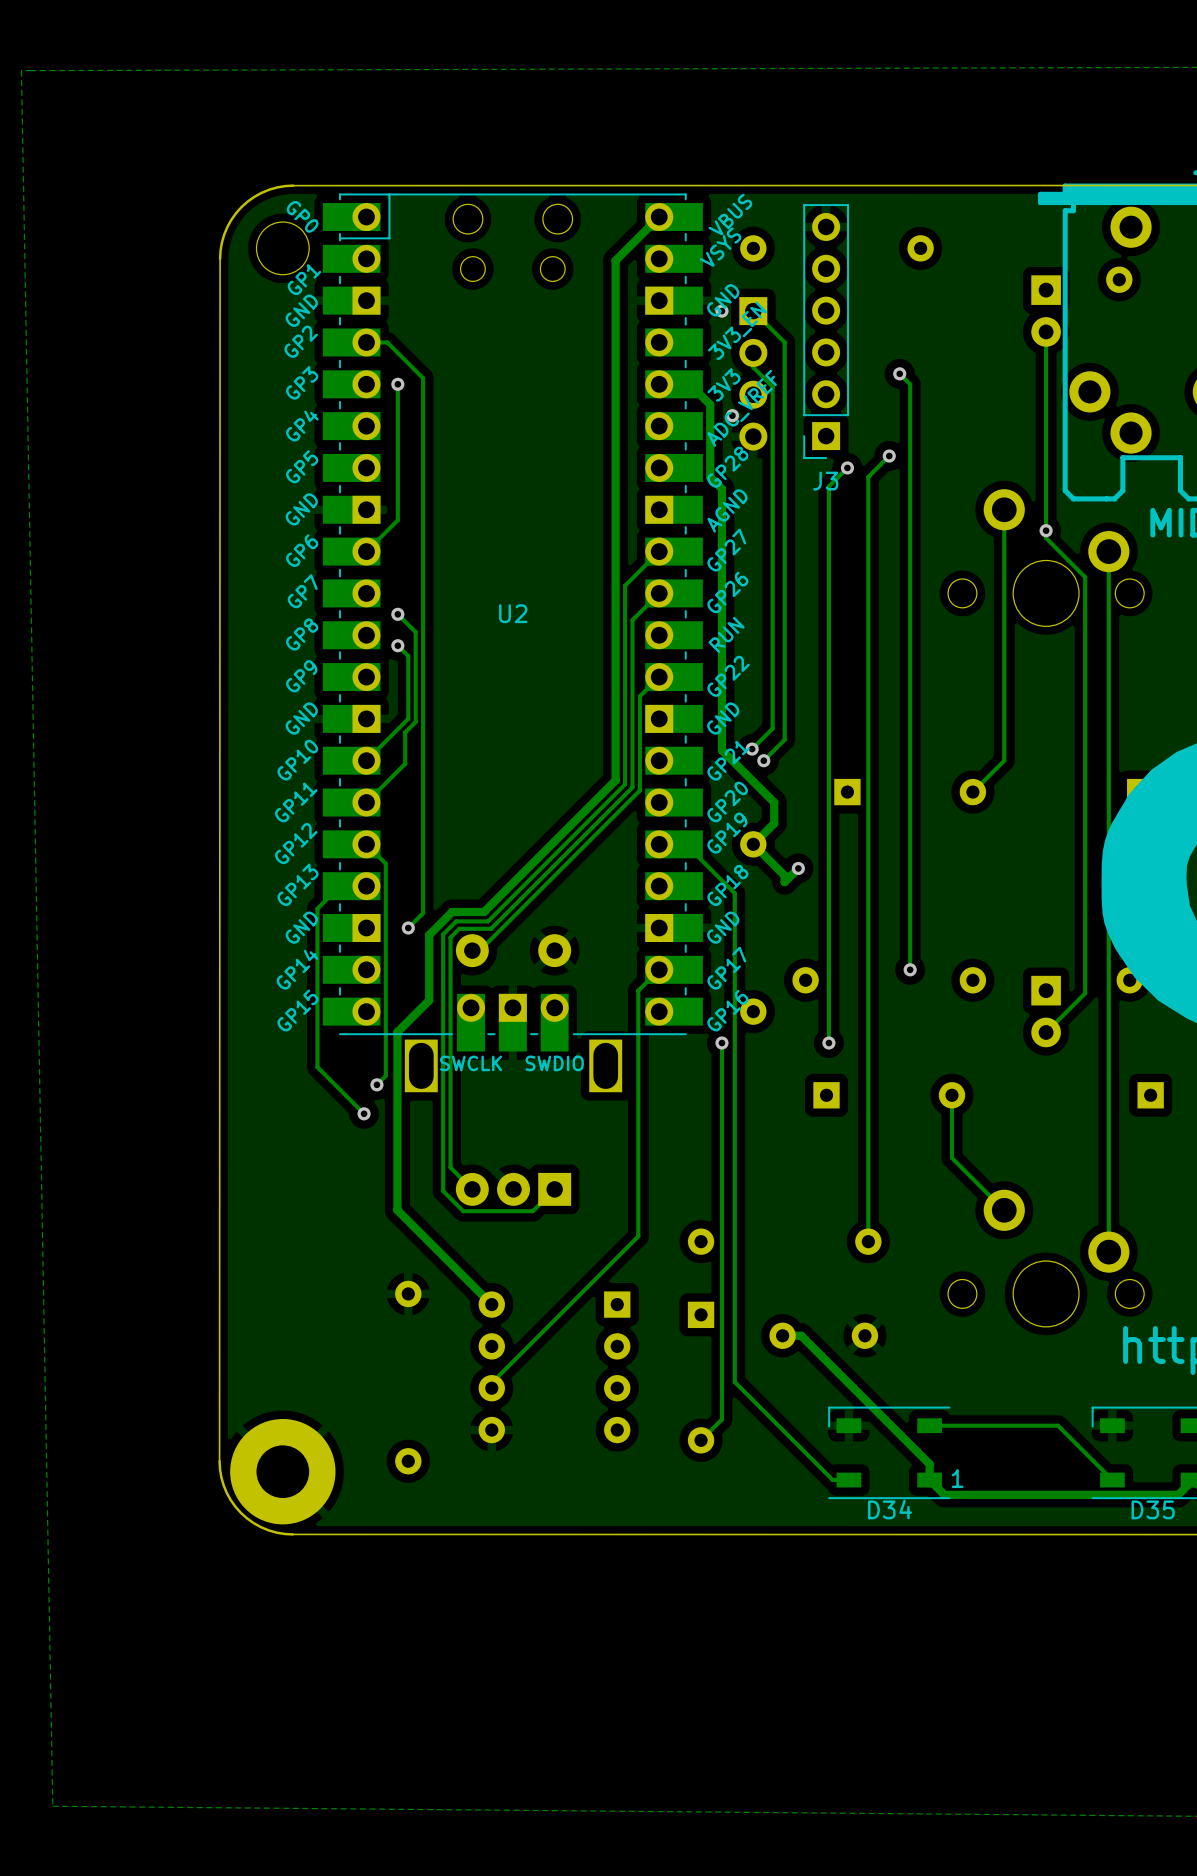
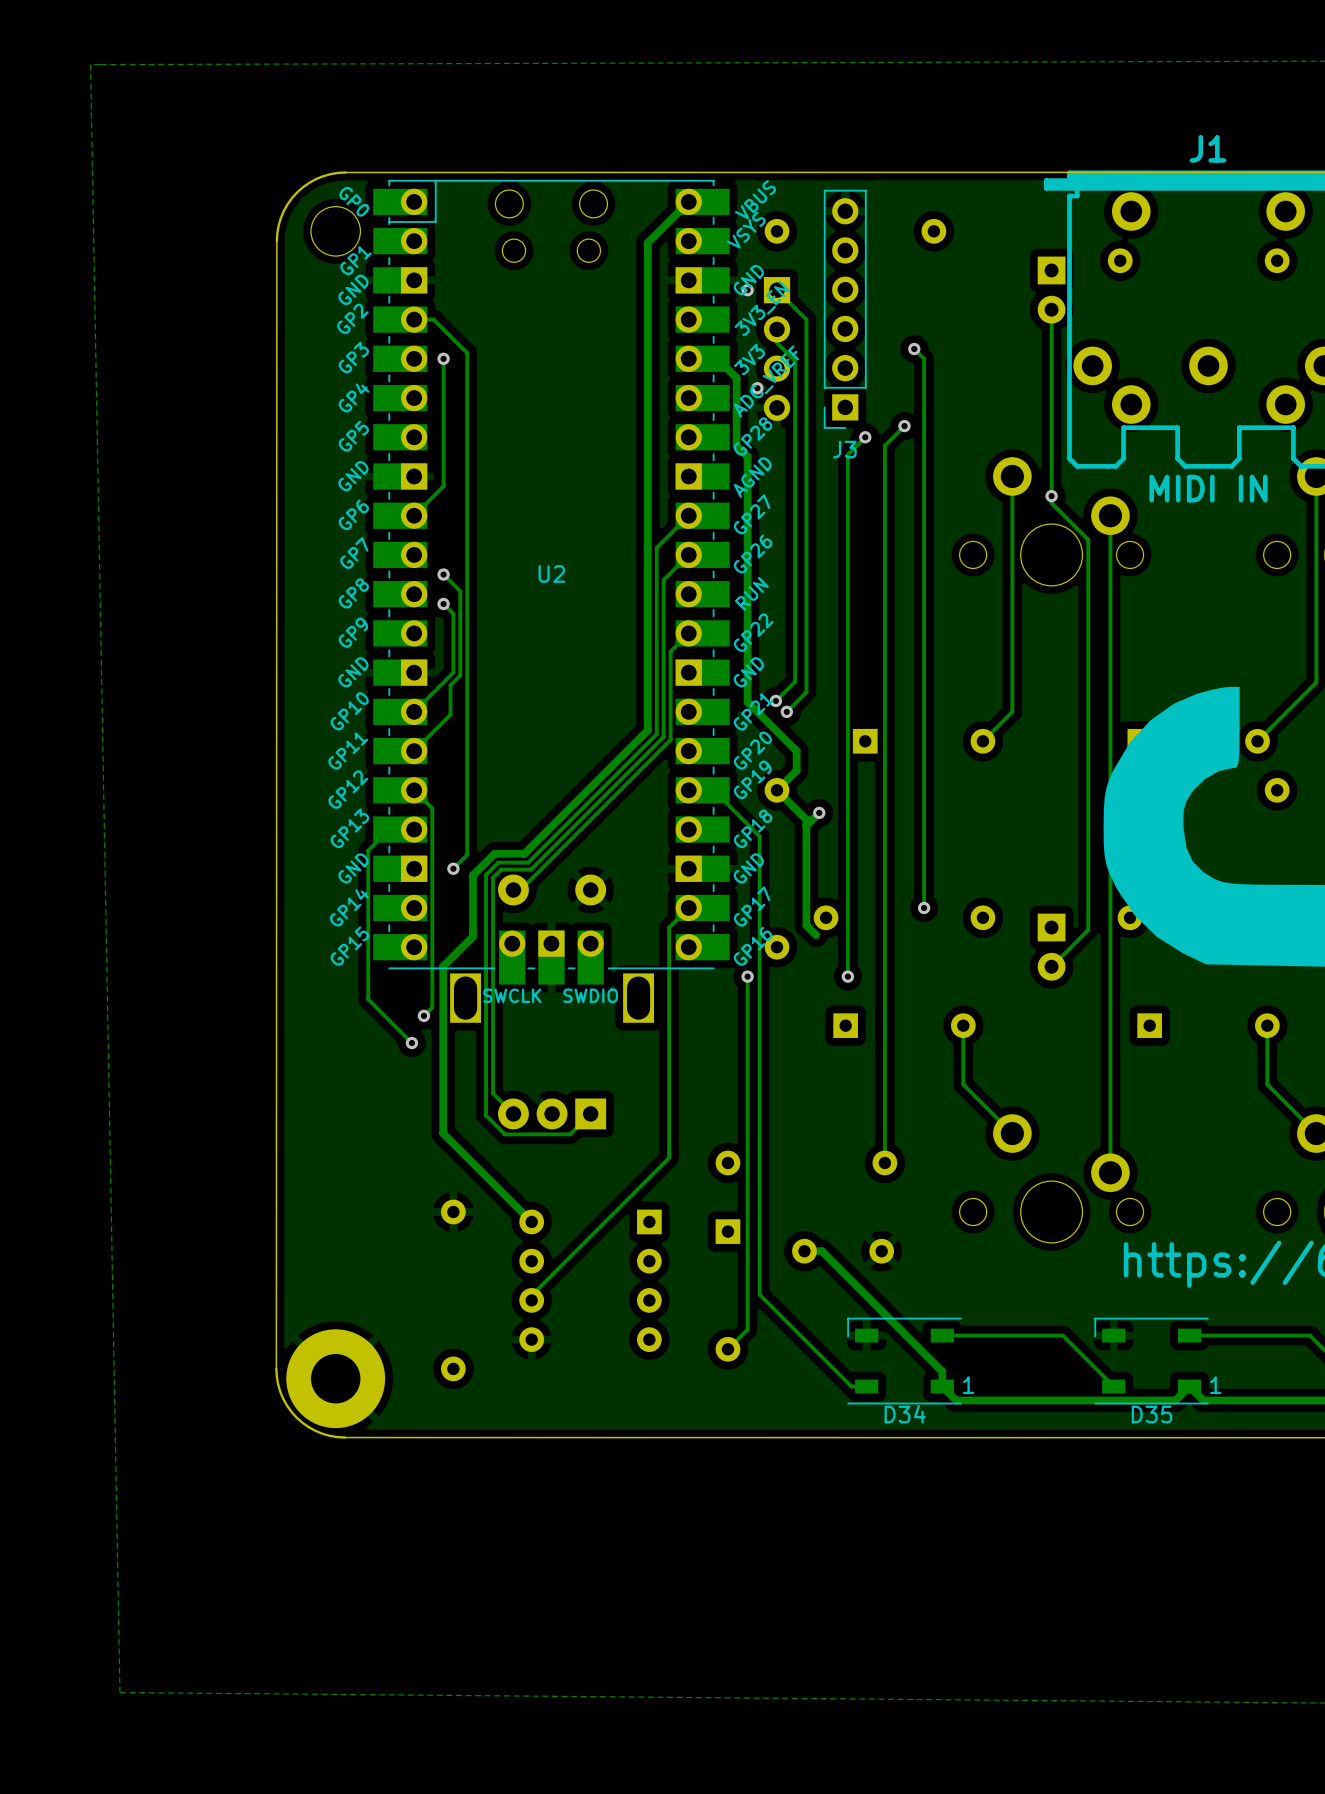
track: none -> (806, 825) (806, 925) (816, 935)

